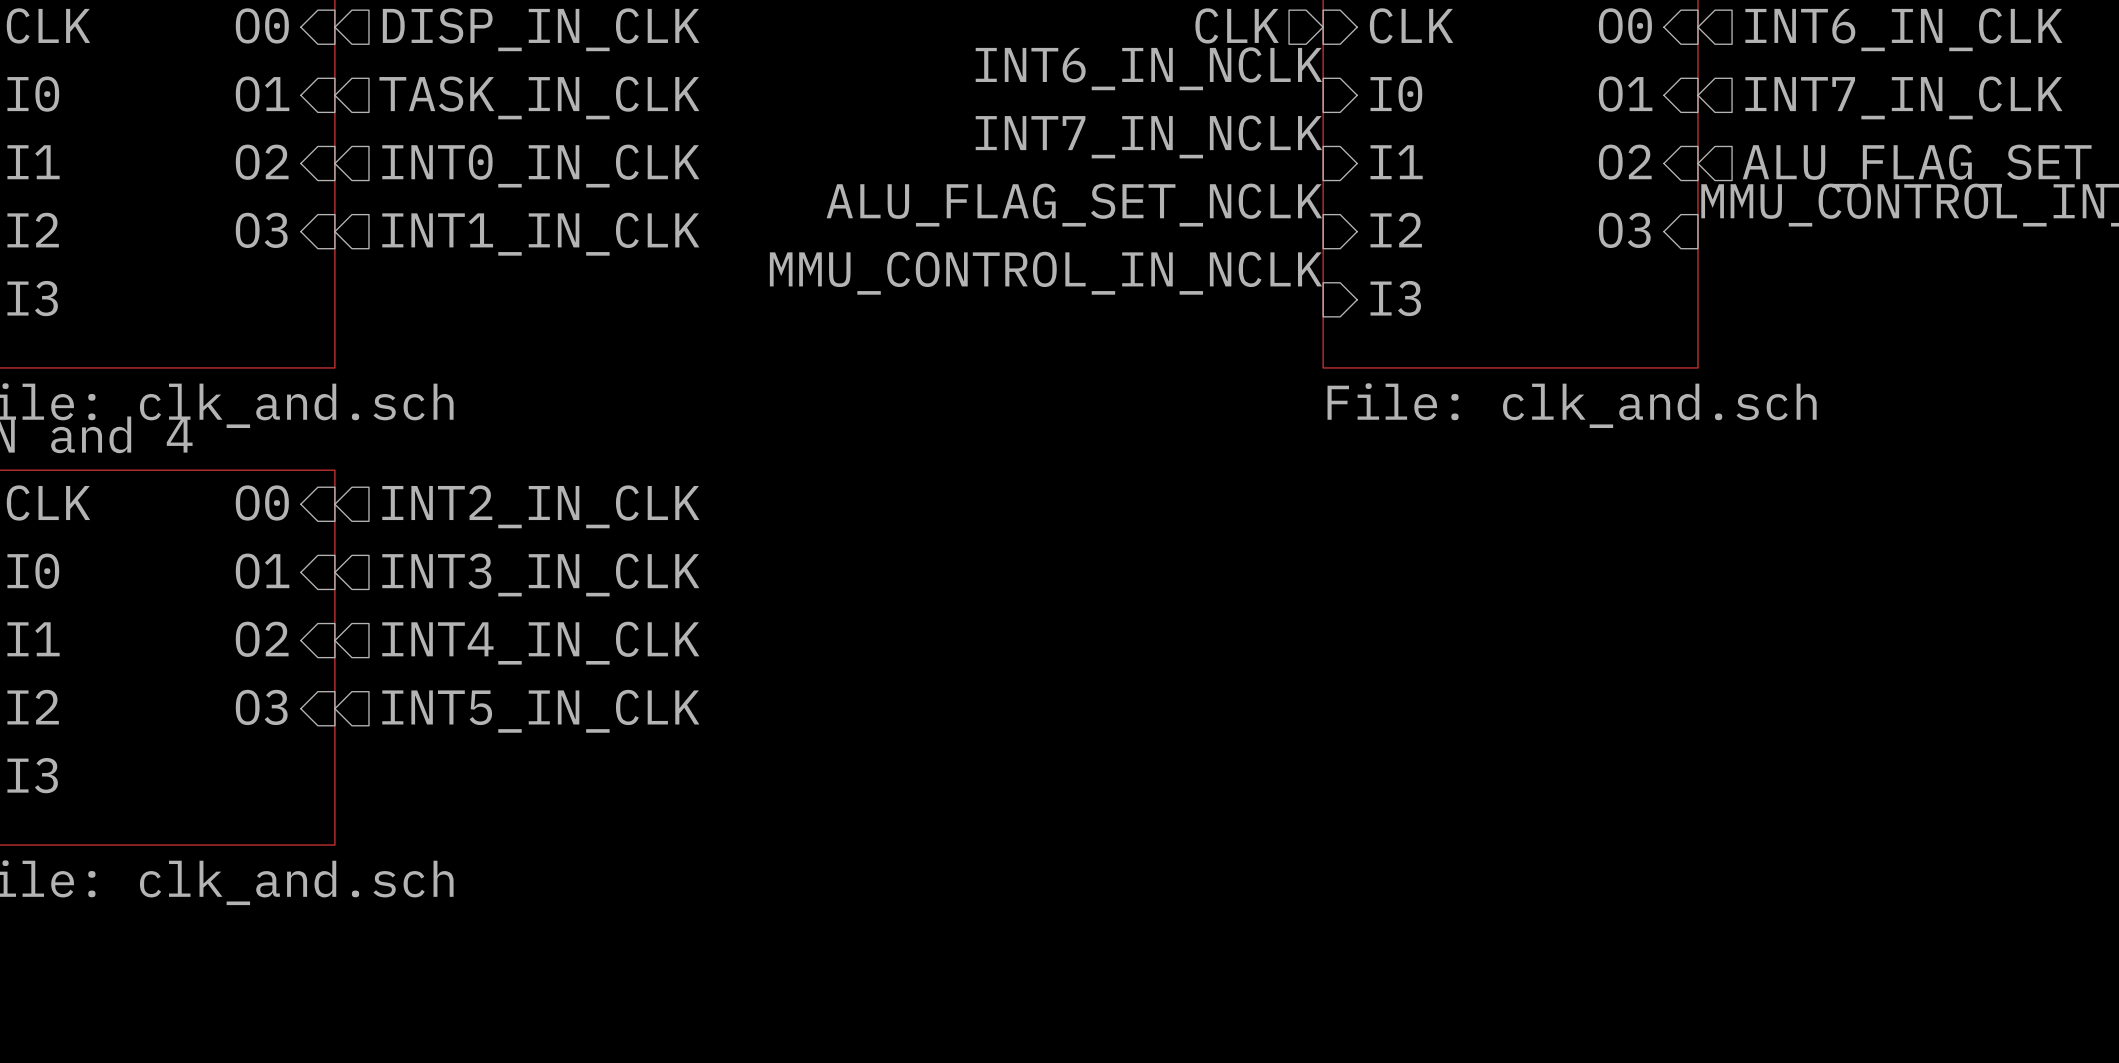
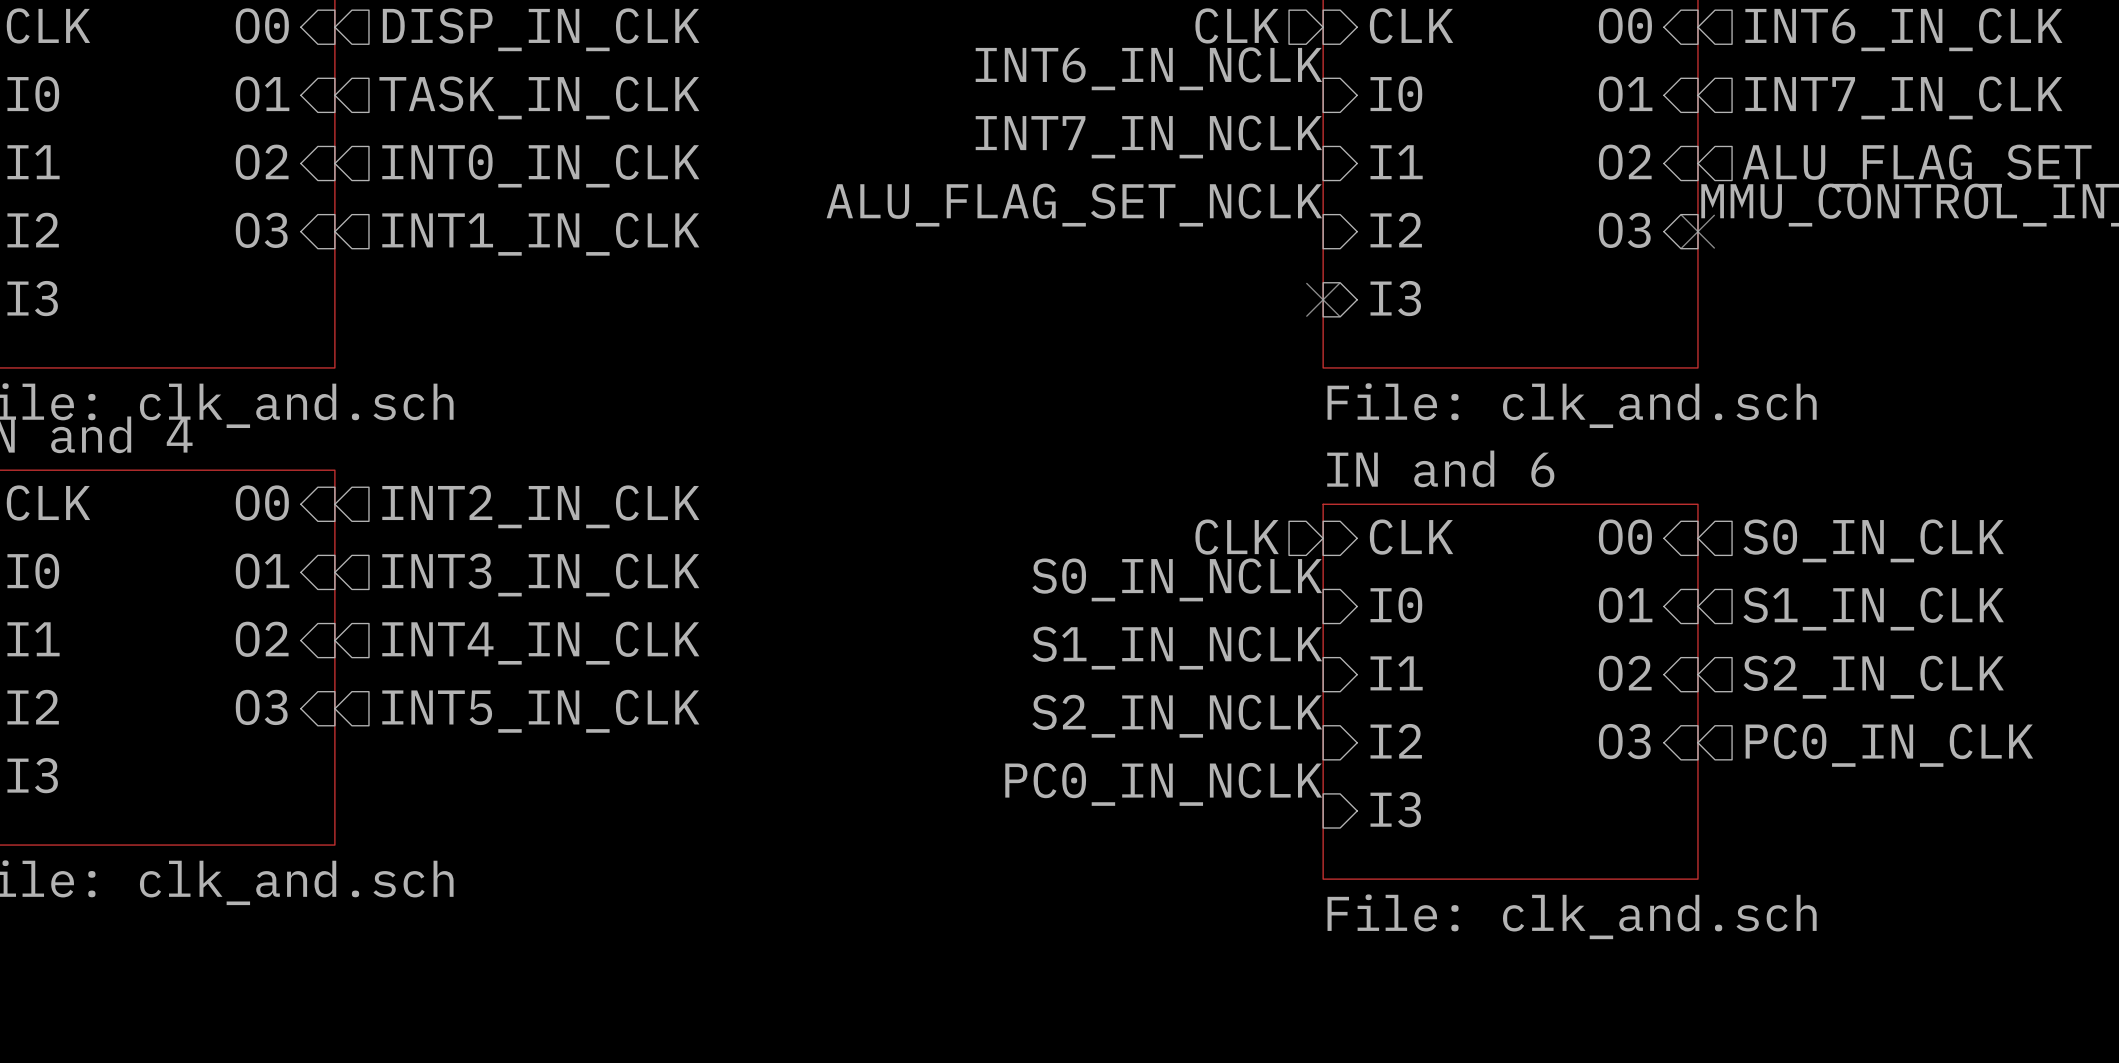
no-connect mark: none -> (1697, 231)
label: MMU_CONTROL_IN_NCLK (1045, 273) -> none
no-connect mark: none -> (1323, 299)
hierarchical label: none -> CLK (1237, 537)
sheet pin: none -> CLK (1411, 537)
sheet pin: none -> O0 (1625, 537)
hierarchical label: none -> S0_IN_CLK (1873, 540)
label: none -> S0_IN_NCLK (1177, 579)
sheet pin: none -> I0 (1396, 605)
sheet pin: none -> O1 (1625, 605)
hierarchical label: none -> S1_IN_CLK (1873, 609)
label: none -> S1_IN_NCLK (1177, 648)
sheet pin: none -> I1 (1396, 673)
sheet pin: none -> O2 (1625, 673)
hierarchical label: none -> S2_IN_CLK (1873, 677)
sheet IN and 6: none -> File: clk_and.sch (1510, 691)
label: none -> S2_IN_NCLK (1177, 716)
sheet pin: none -> I2 (1396, 741)
sheet pin: none -> O3 (1624, 741)
hierarchical label: none -> PC0_IN_CLK (1889, 745)
label: none -> PC0_IN_NCLK (1163, 784)
sheet pin: none -> I3 (1395, 809)

